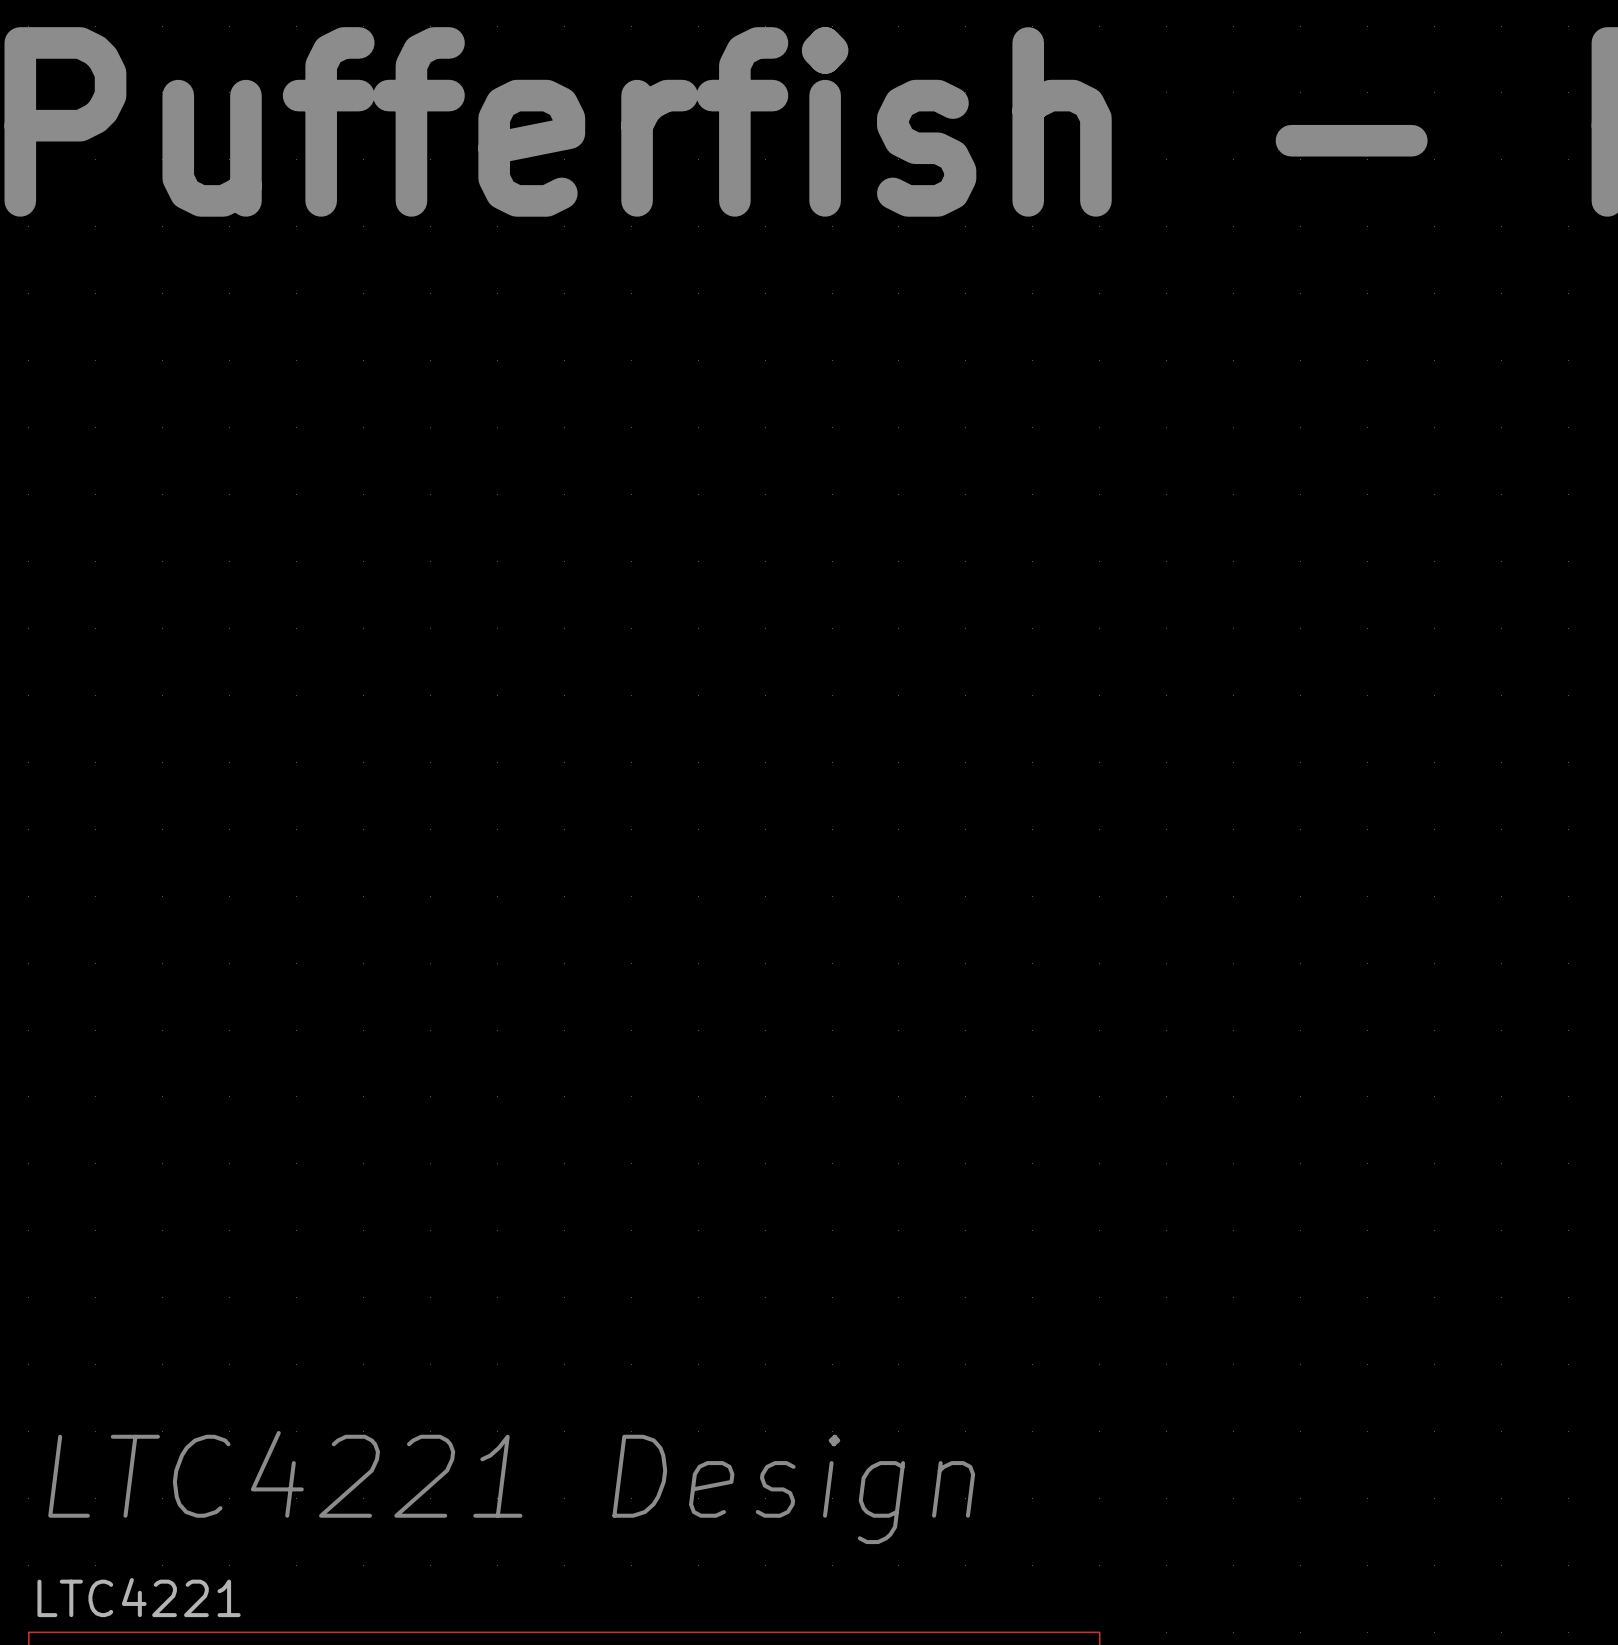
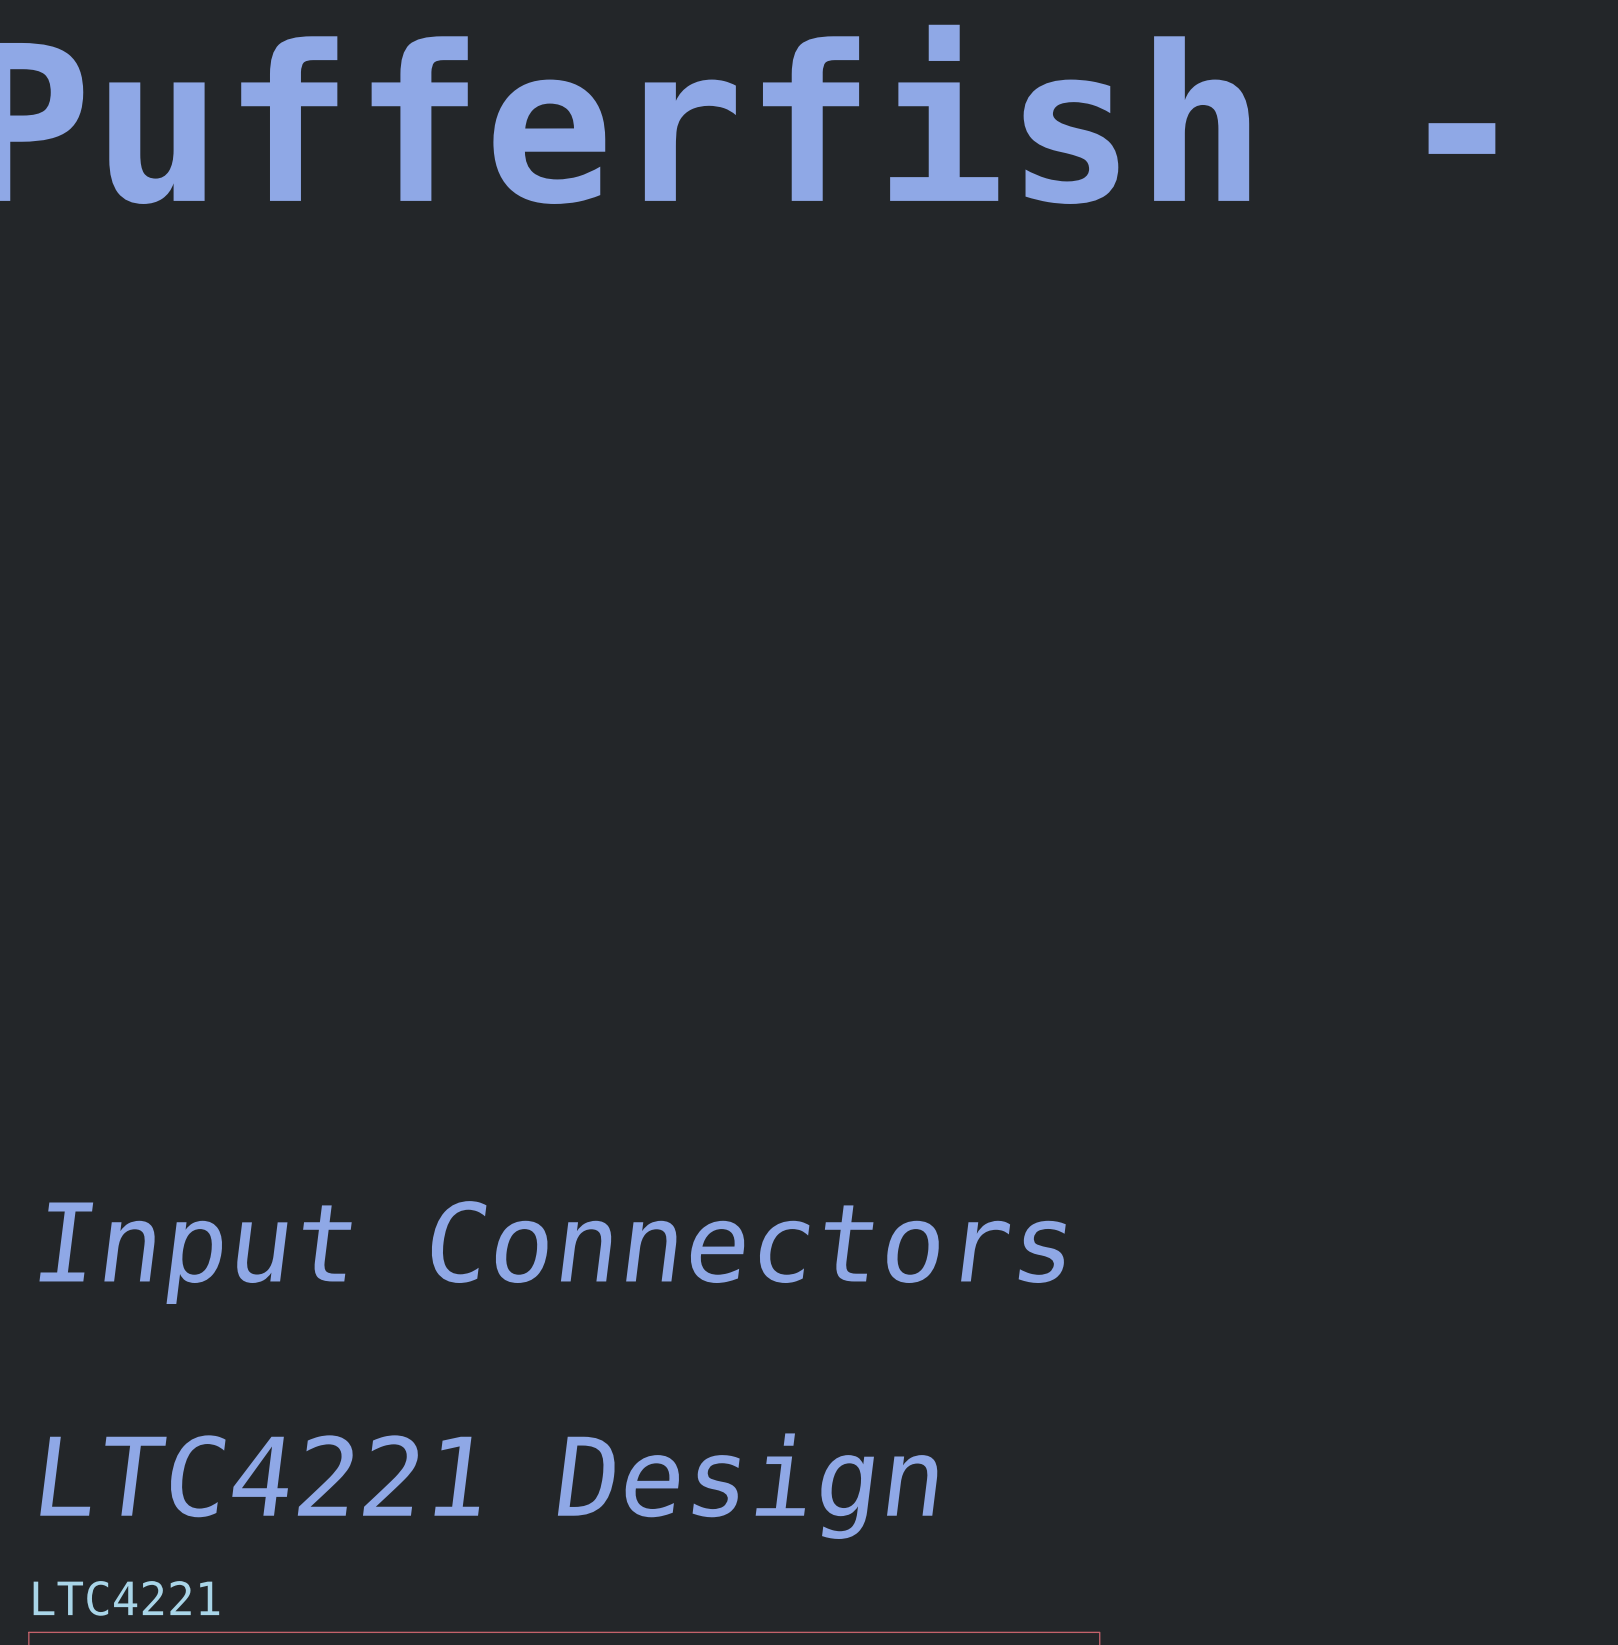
text: none -> Input Connectors (552, 1252)

